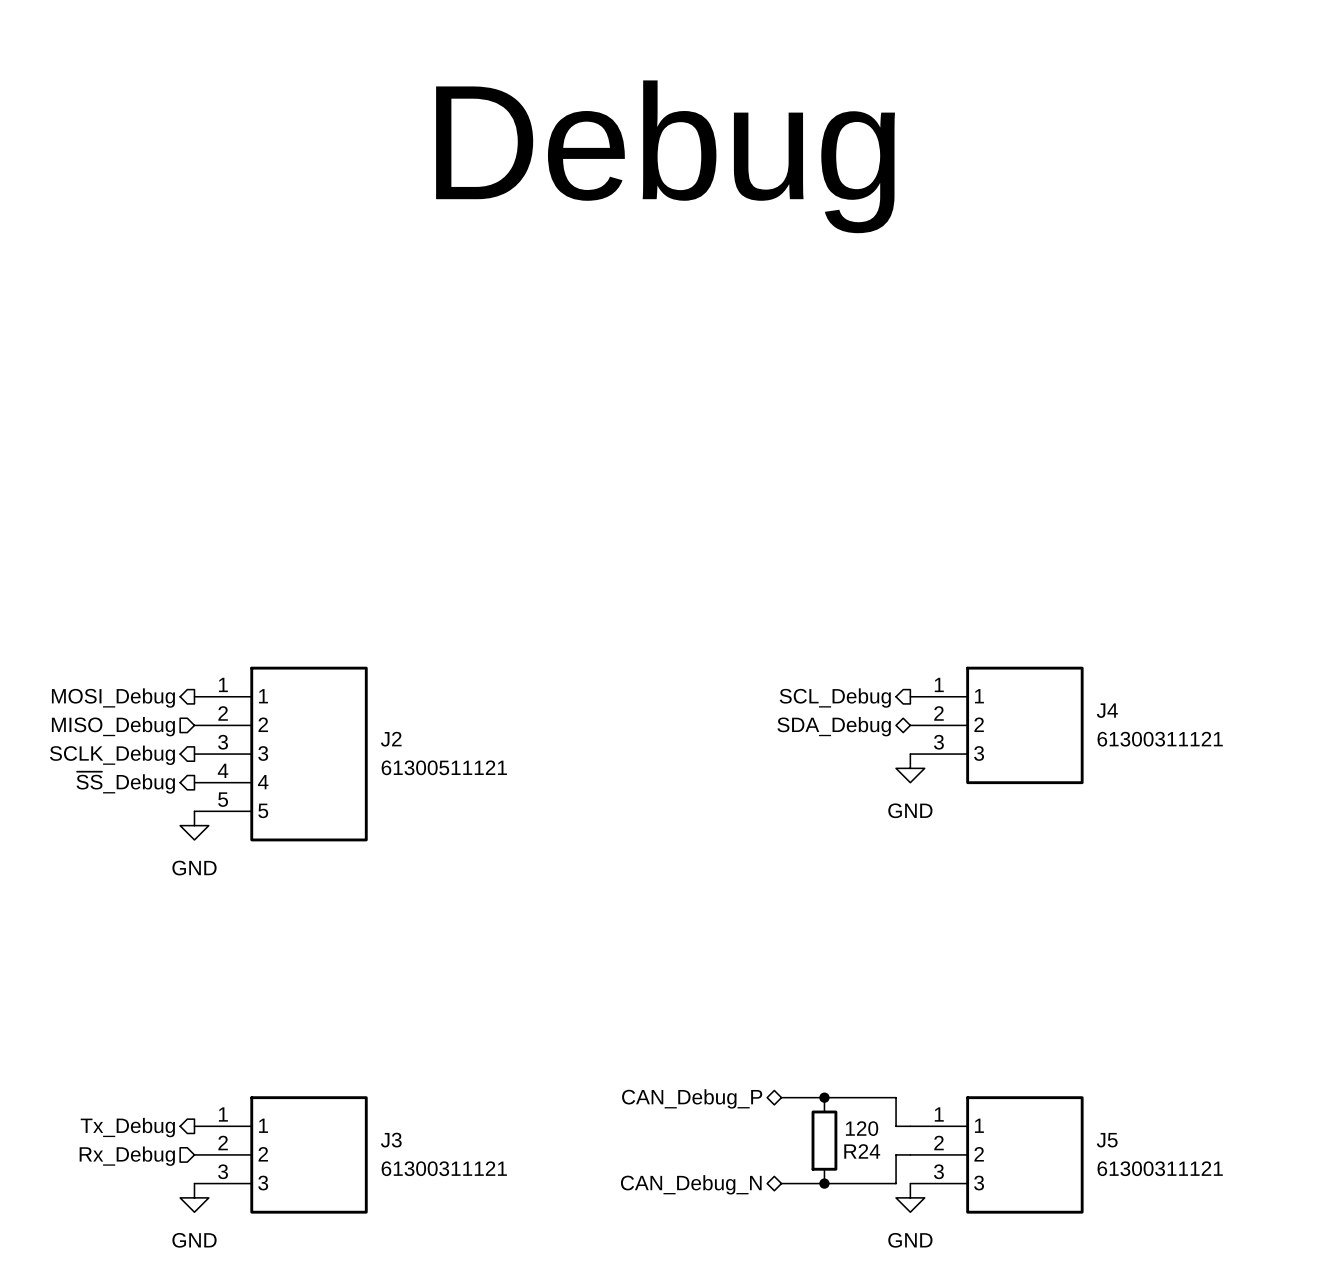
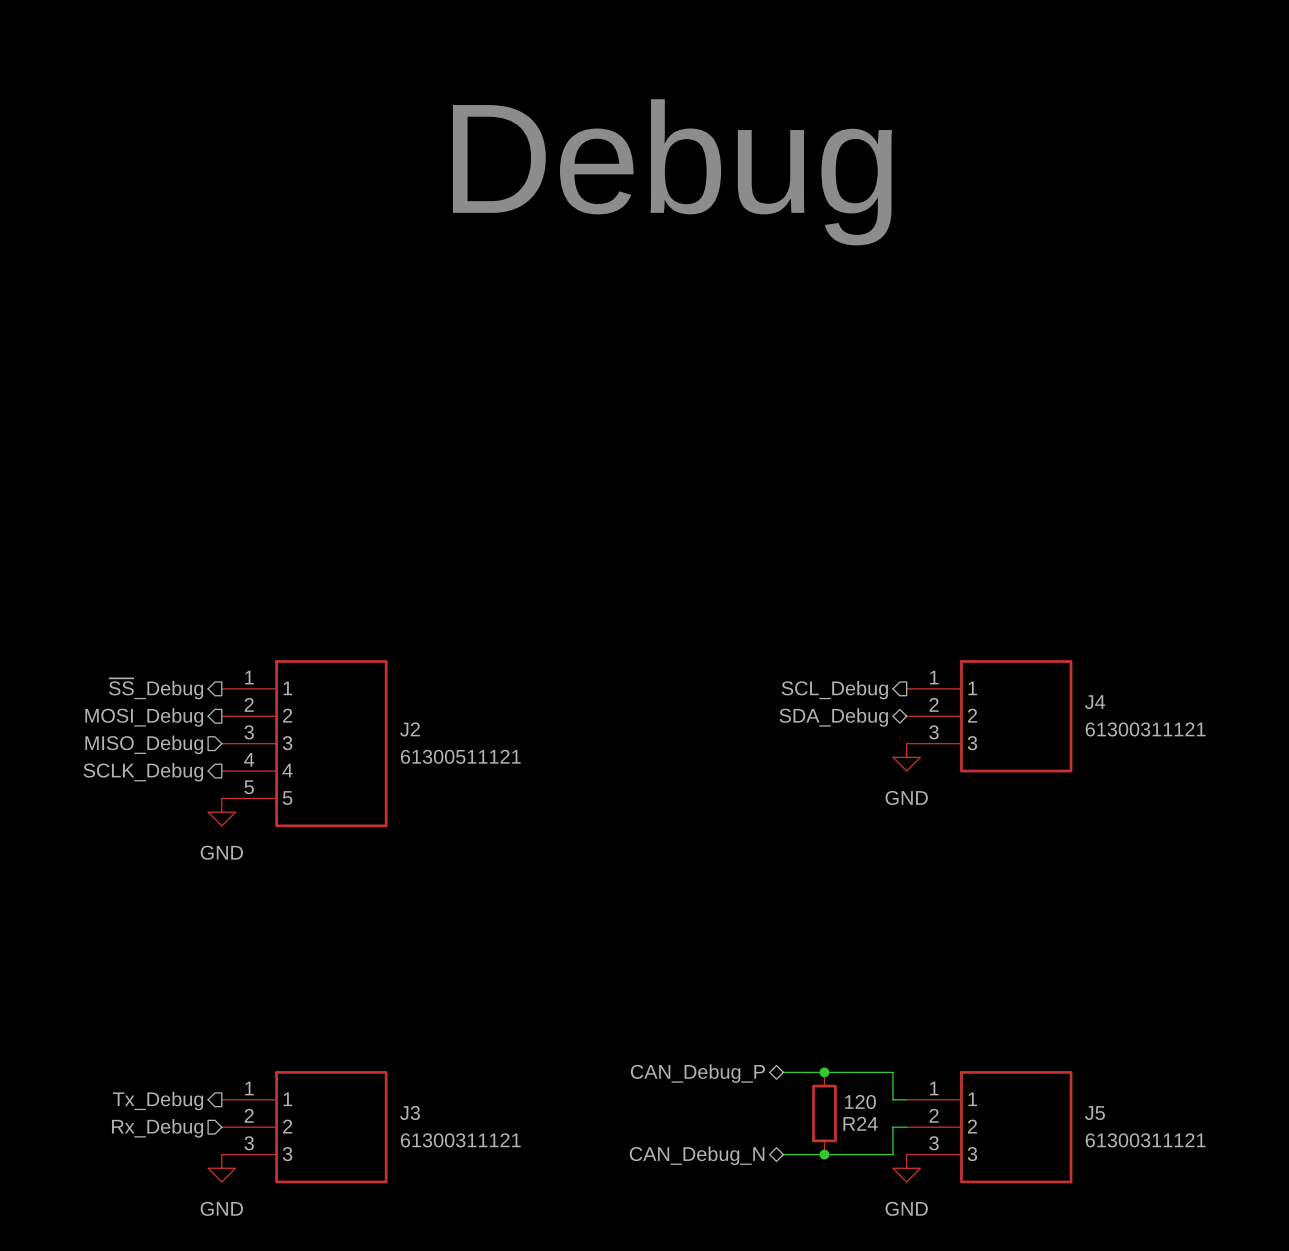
hierarchical label: MOSI_Debug (113, 698) -> ~{SS}_Debug (156, 688)
hierarchical label shape: input (113, 726) -> output (144, 717)
hierarchical label: MISO_Debug (113, 726) -> MOSI_Debug (144, 717)
hierarchical label shape: output (112, 755) -> input (144, 744)
hierarchical label: SCLK_Debug (112, 755) -> MISO_Debug (144, 744)
hierarchical label: ~{SS}_Debug (125, 782) -> SCLK_Debug (143, 772)

